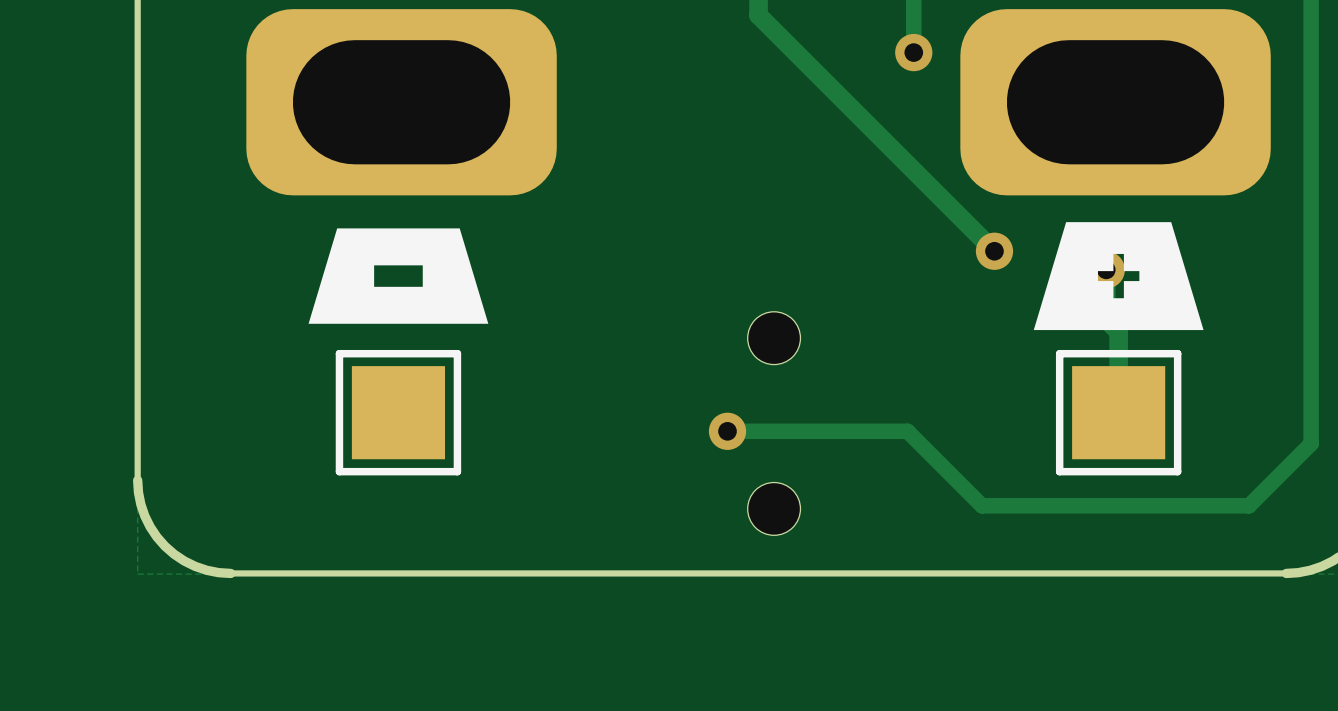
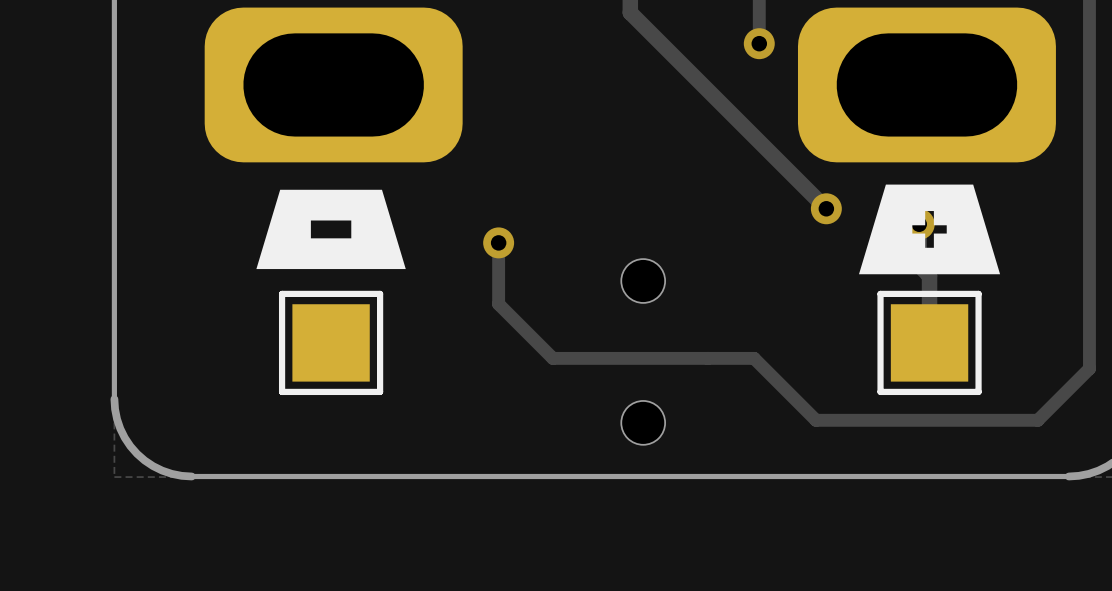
track: none -> (498, 242) (498, 304) (552, 358) (604, 358)
via position: (727, 431) -> (498, 242)

